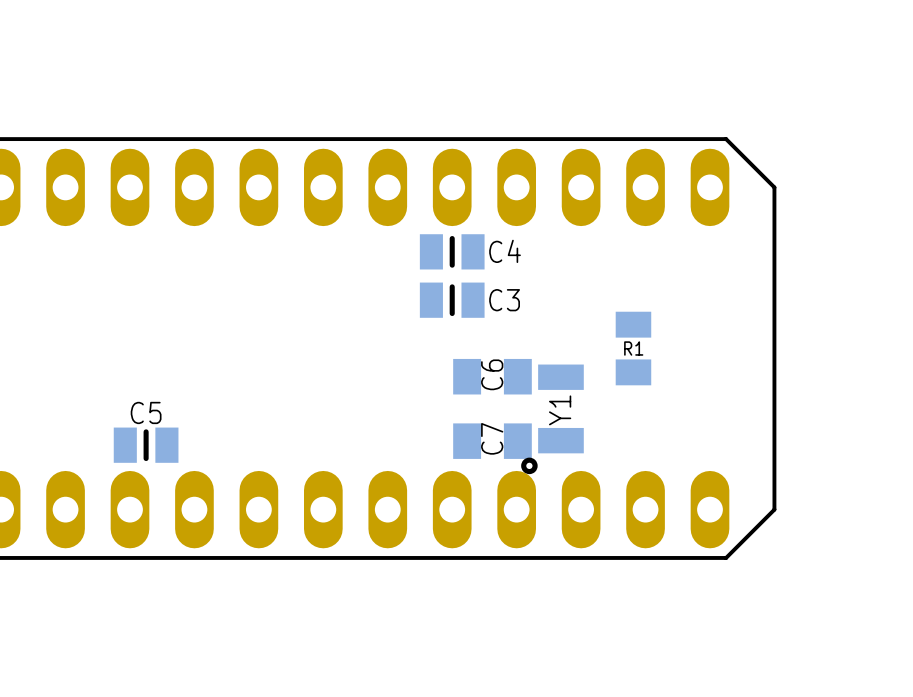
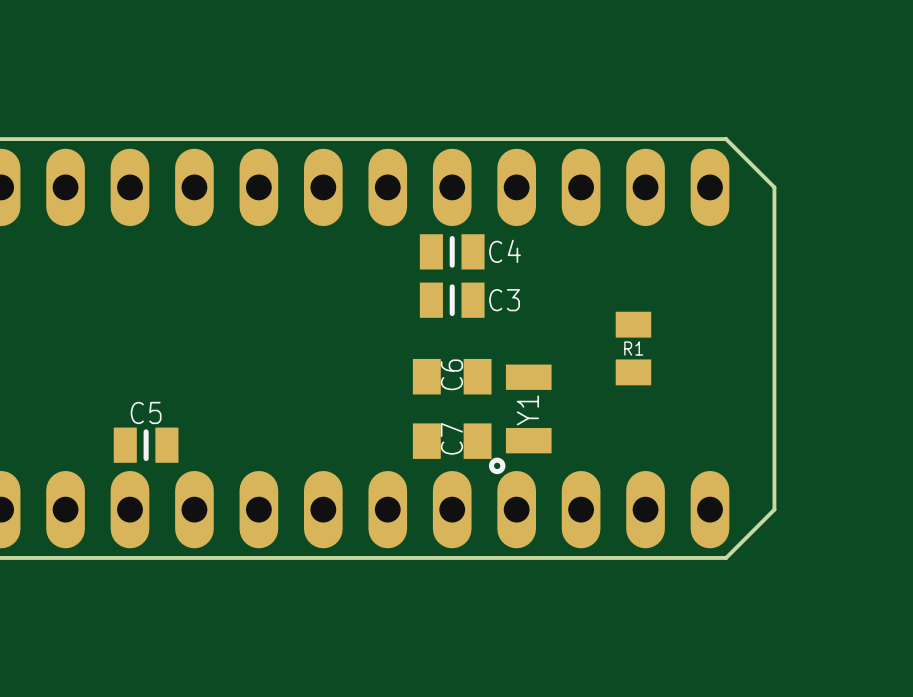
C6 position: (492, 376) -> (452, 376)
Y1 position: (552, 419) -> (520, 419)
C7 position: (492, 441) -> (452, 441)

